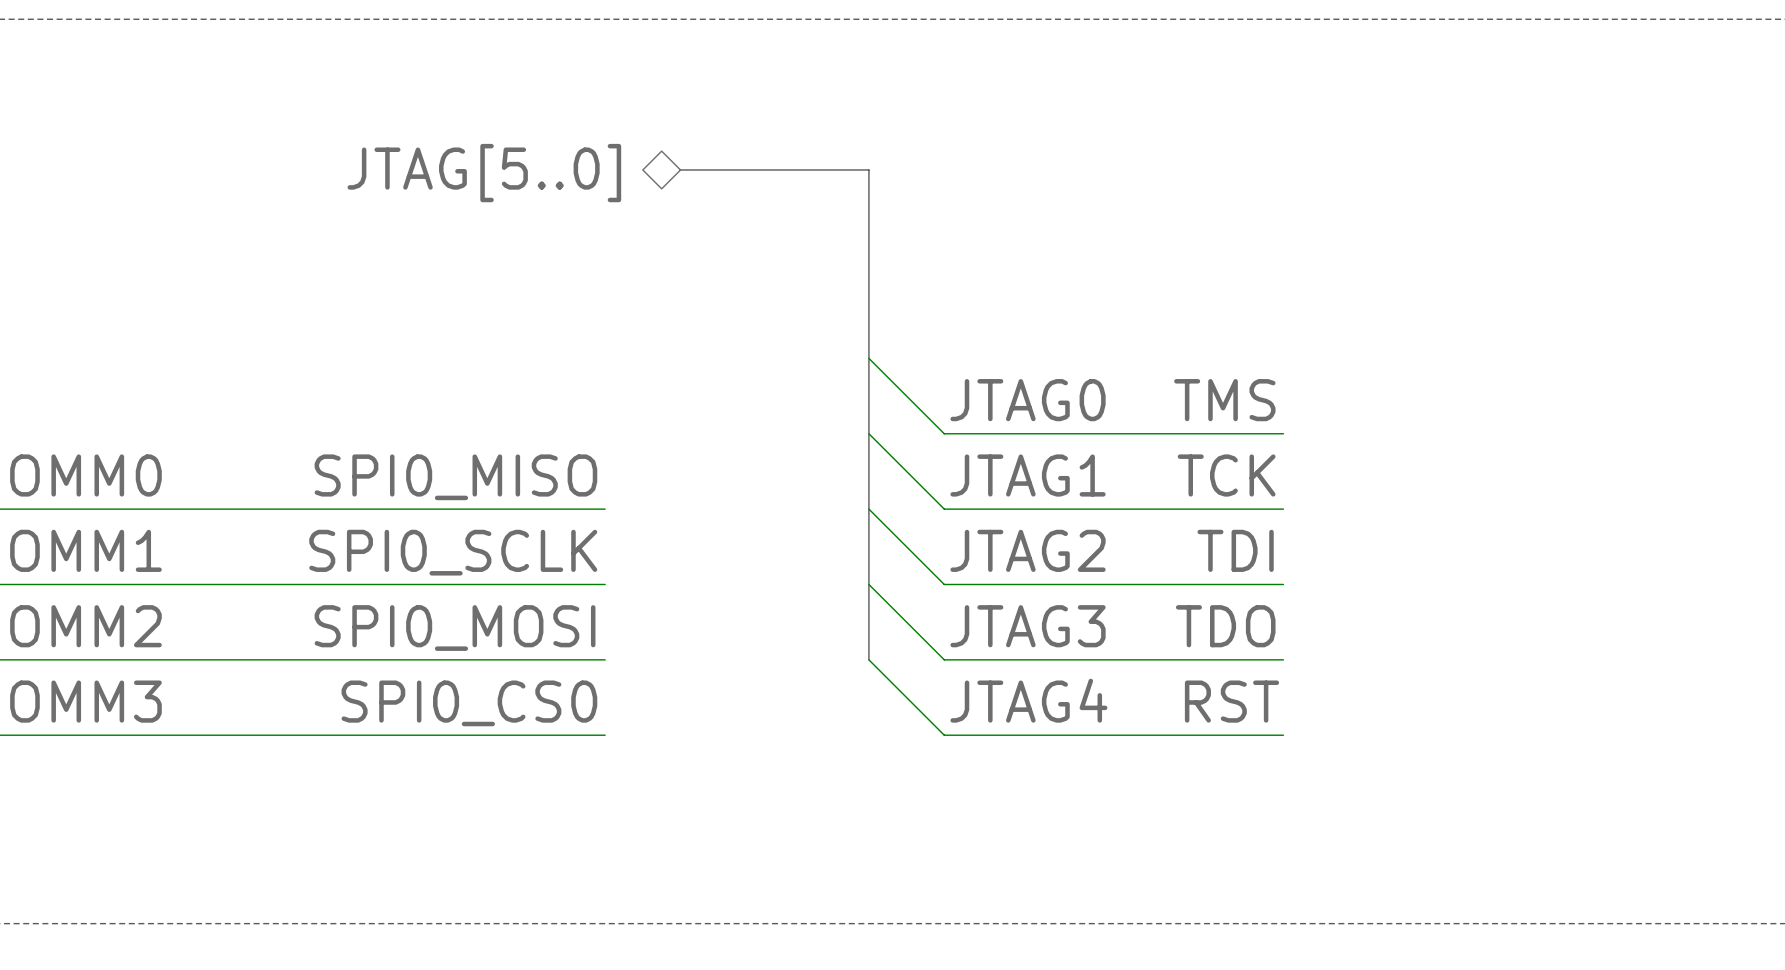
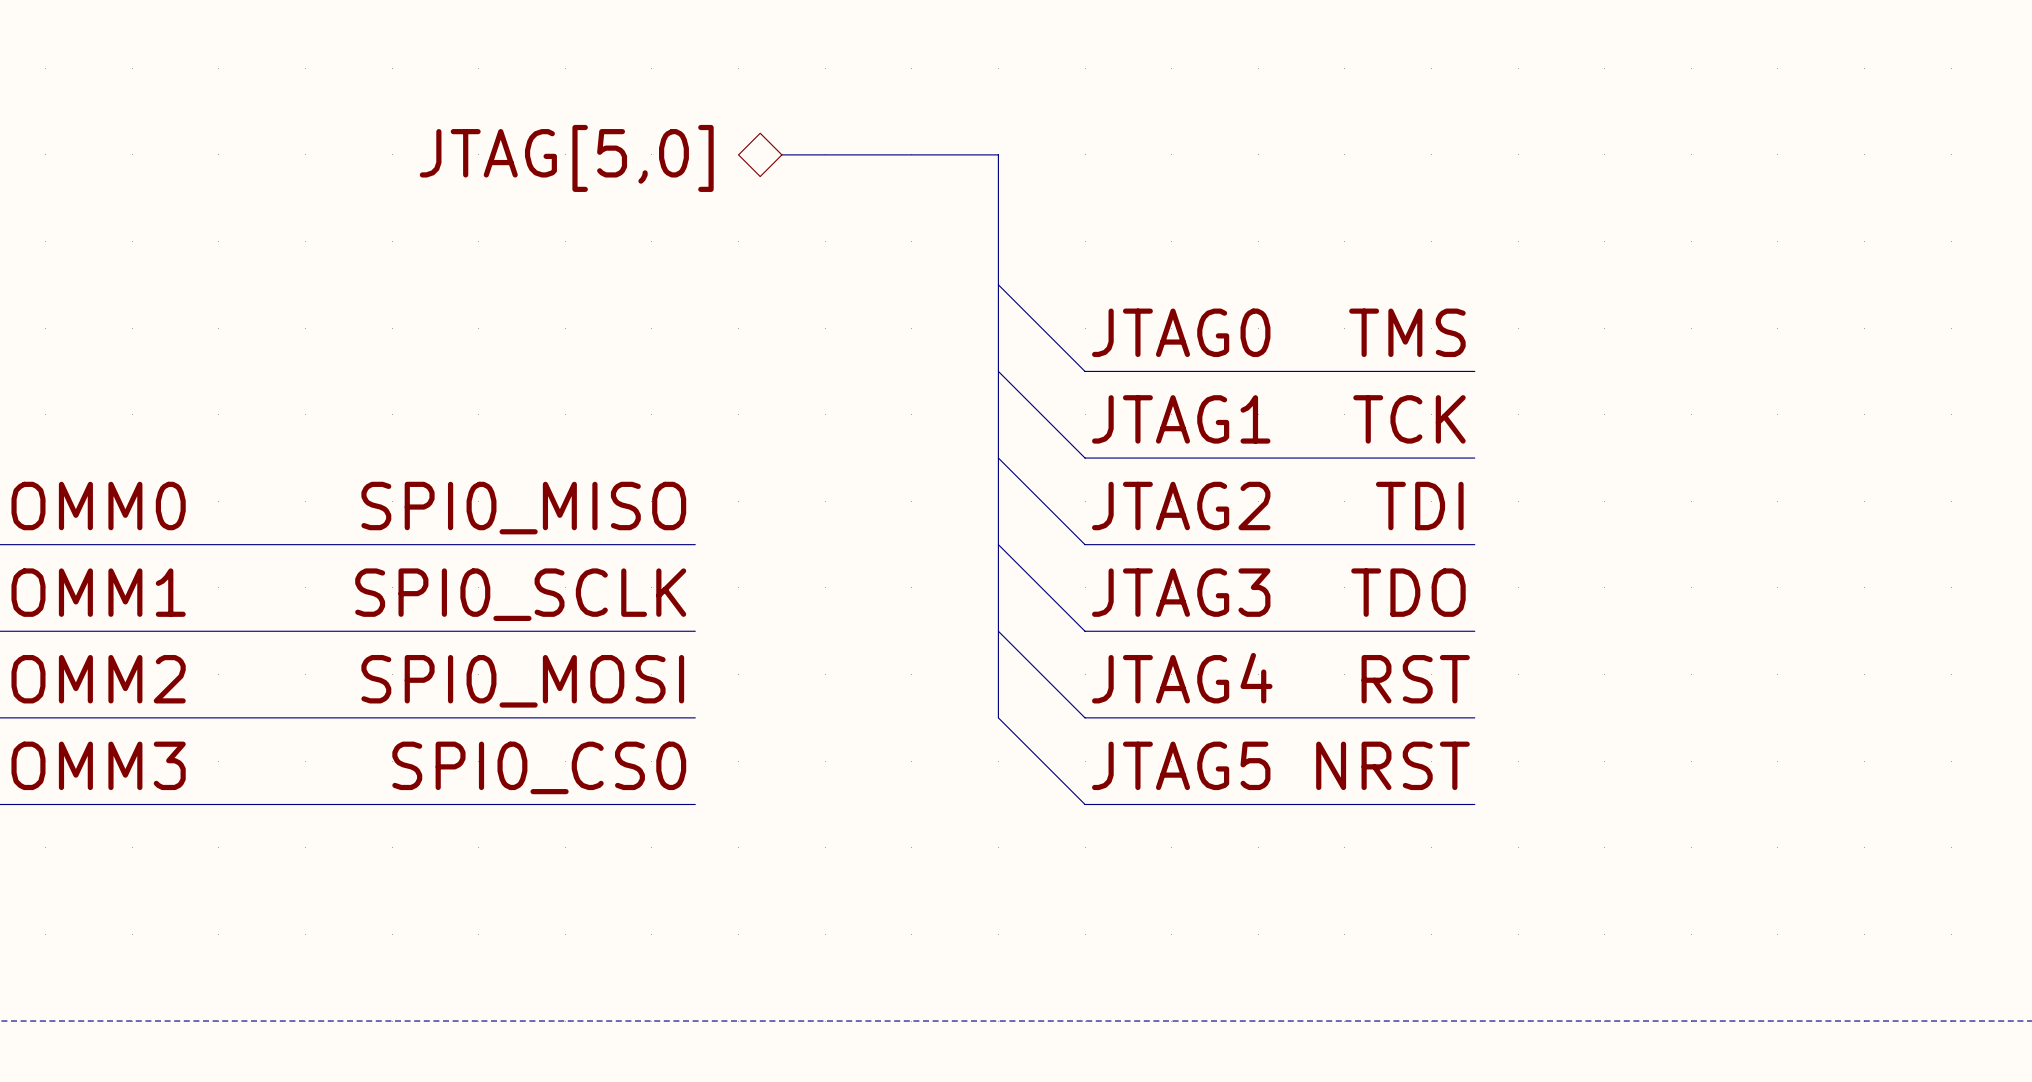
hierarchical label: JTAG[5..0] (484, 173) -> JTAG[5,0] (566, 158)
wire: none -> (998, 284) (1085, 371) (1474, 371)
label: none -> JTAG0 (1181, 332)
label: none -> TMS (1407, 332)
label: JTAG0 (1028, 400) -> JTAG1 (1181, 419)
label: TMS (1224, 400) -> TCK (1409, 419)
label: JTAG1 (1028, 475) -> JTAG2 (1181, 506)
label: TCK (1226, 475) -> TDI (1419, 506)
label: JTAG2 (1028, 550) -> JTAG3 (1181, 592)
label: TDI (1235, 550) -> TDO (1408, 592)
label: JTAG3 (1028, 626) -> JTAG4 (1182, 678)
label: TDO (1225, 626) -> RST (1415, 679)
label: JTAG4 (1028, 700) -> JTAG5 (1181, 765)
label: RST (1232, 701) -> NRST (1392, 765)

